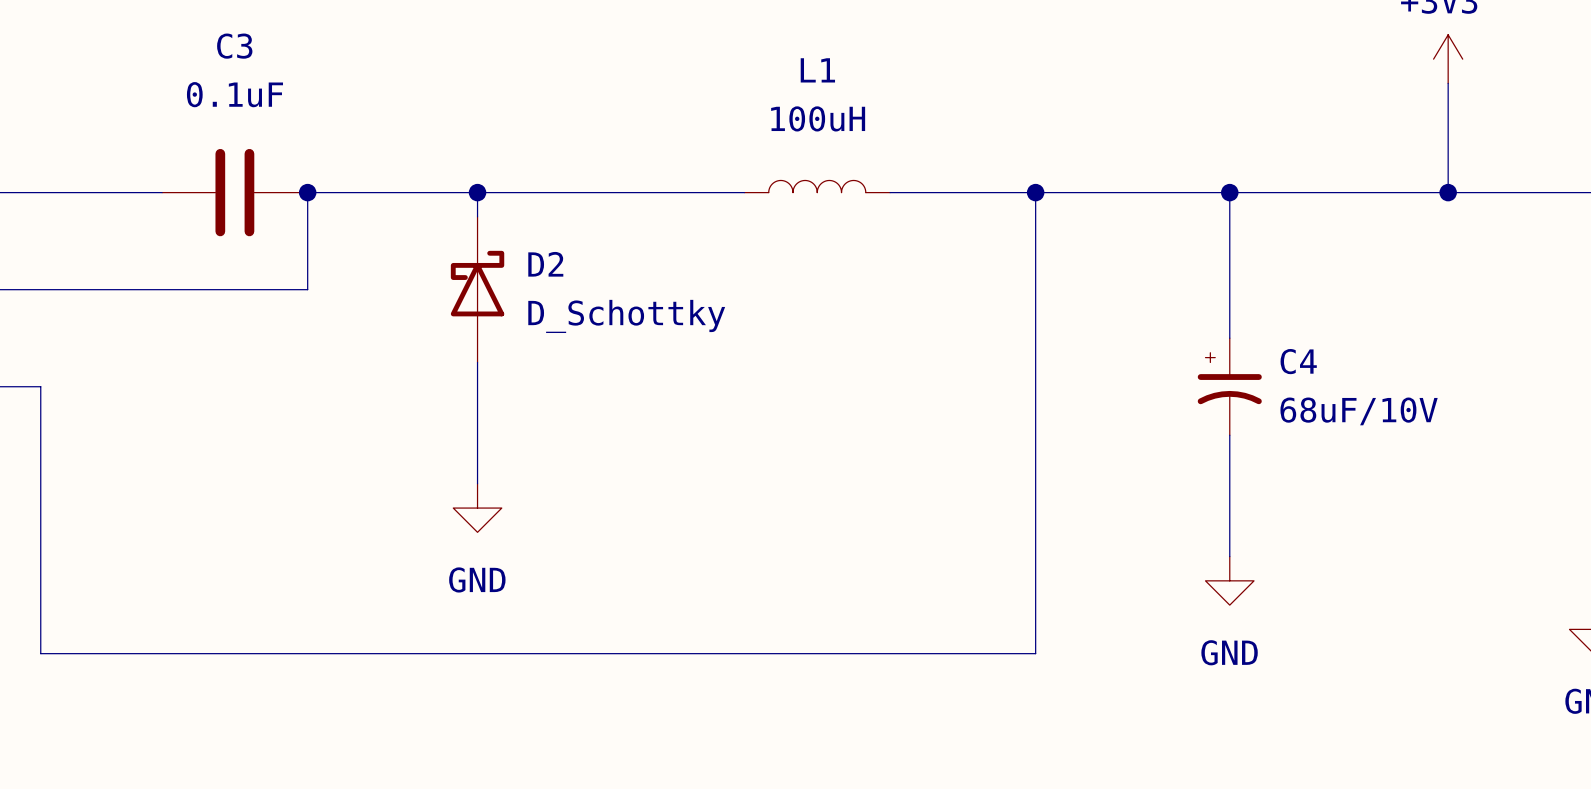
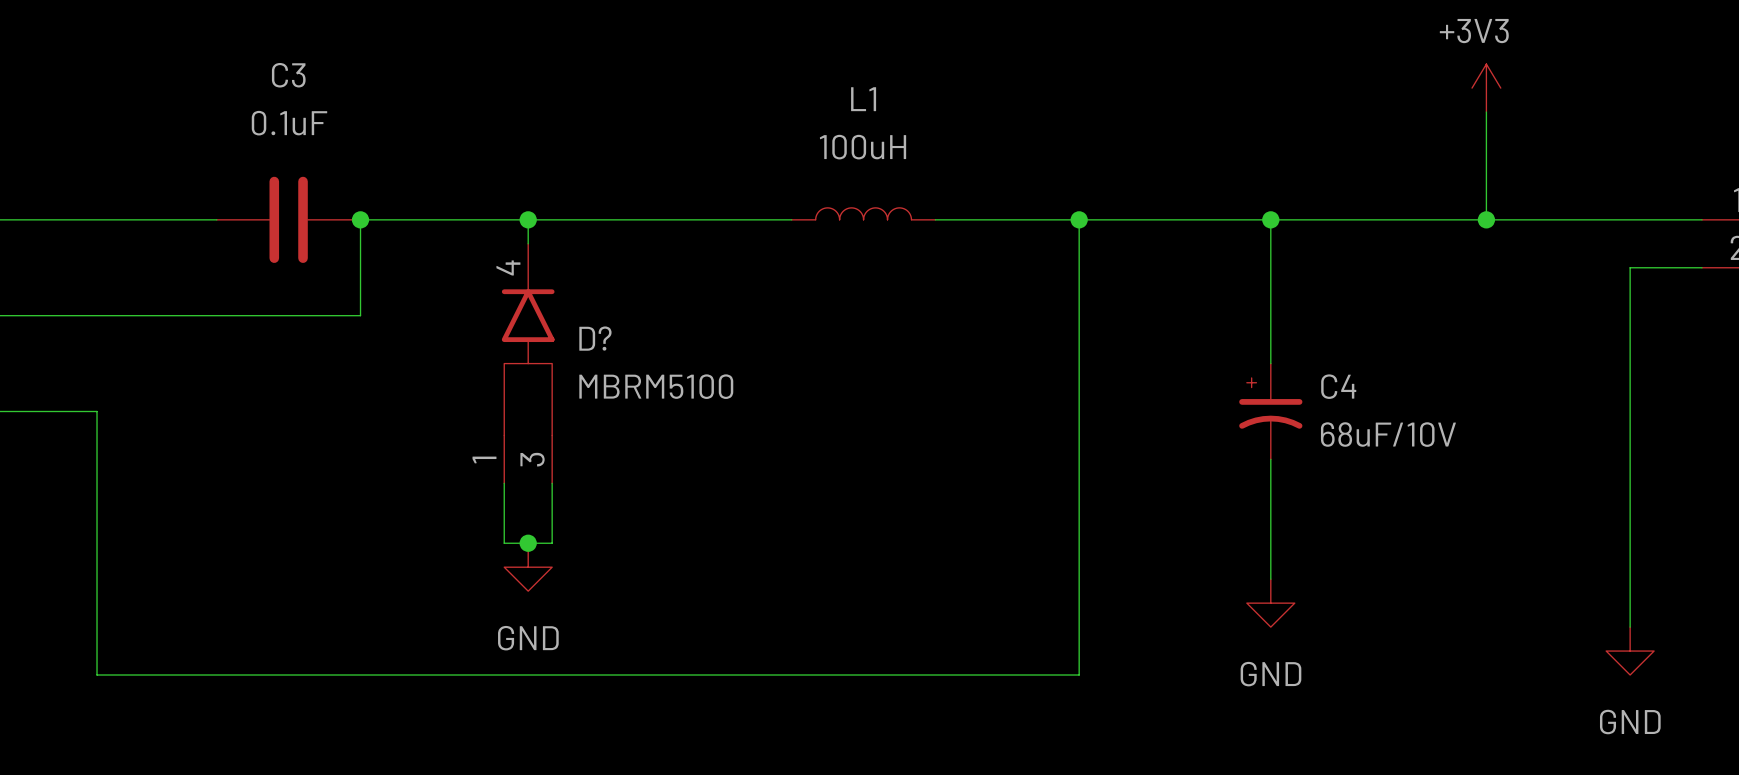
D2: D_Schottky (477, 289) -> none
D?: none -> MBRM5100 (528, 363)
wire: (477, 362) (477, 483) -> none
wire: none -> (504, 483) (504, 543) (552, 543) (552, 483)
power symbol position: GND (477, 508) -> GND (528, 567)
junction: none -> (528, 543)

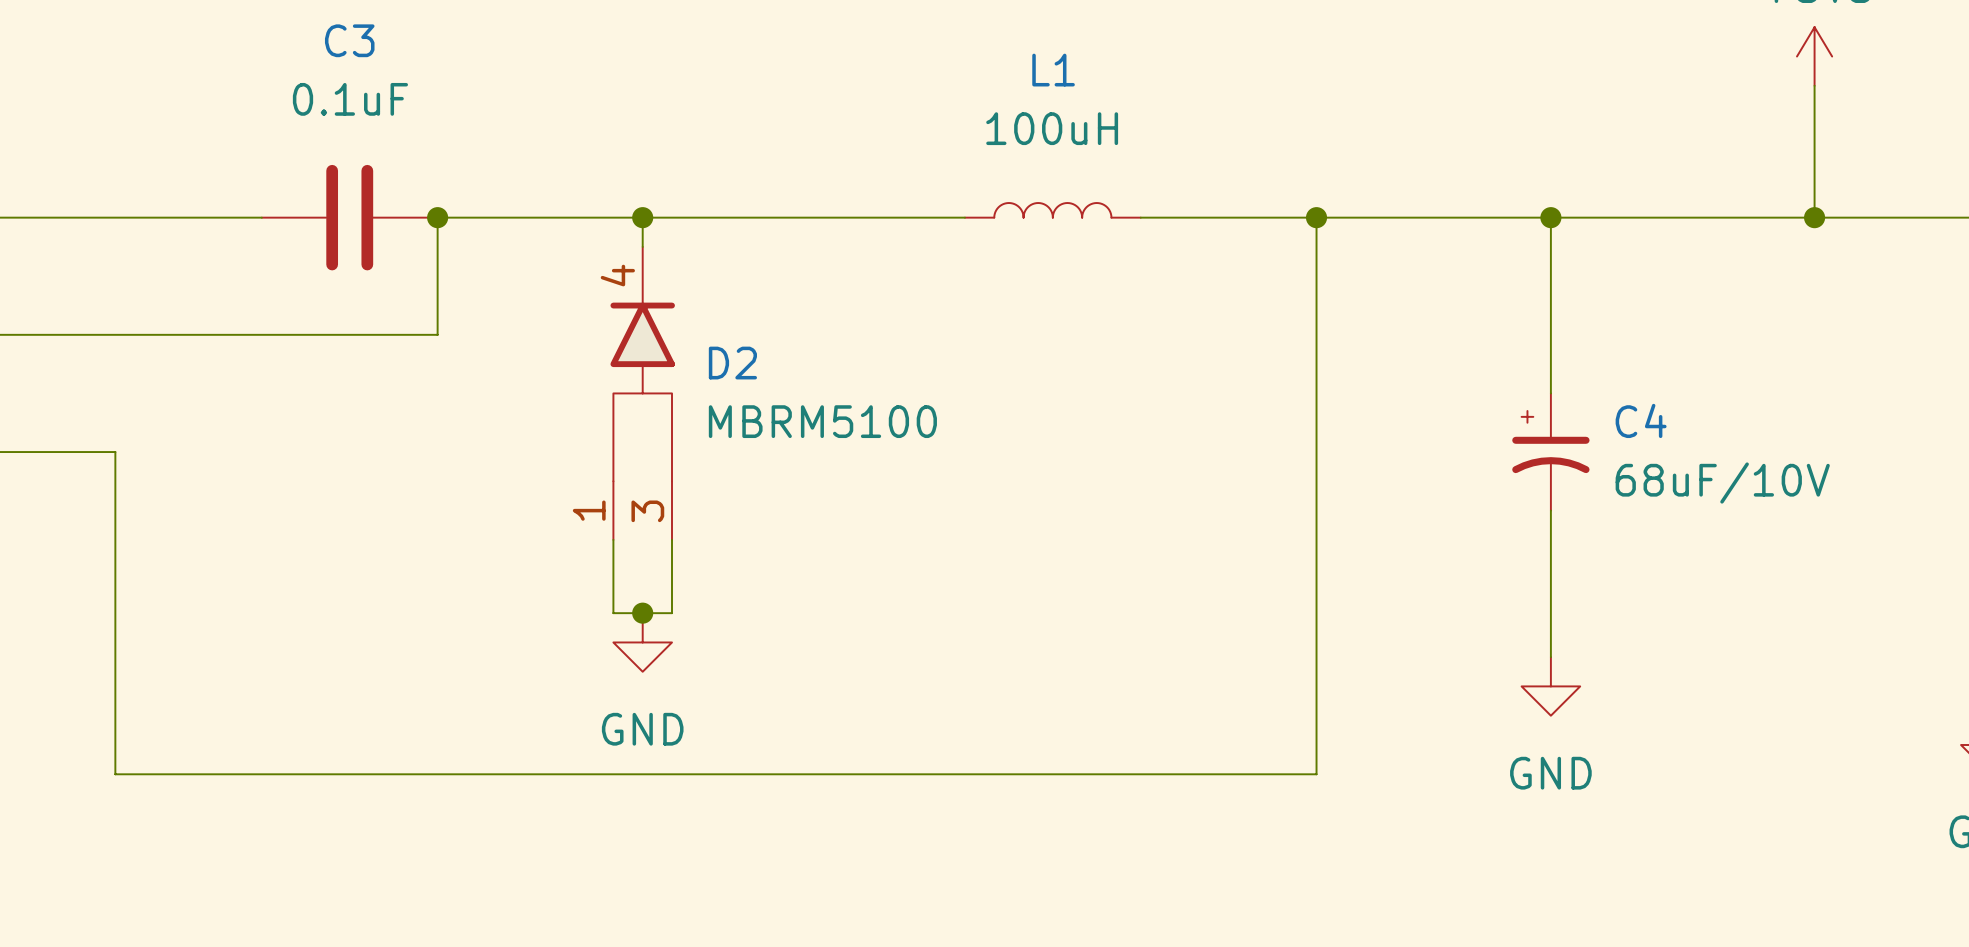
D? name: D? (595, 338) -> D2 (732, 363)

